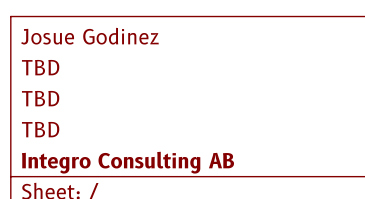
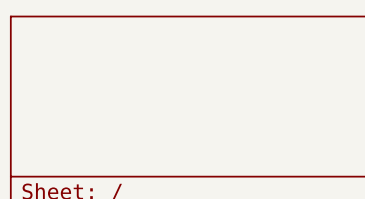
title block: Josue Godinez (89, 36) -> none
title block: TBD (40, 67) -> none
title block: TBD (40, 98) -> none
title block: TBD (40, 129) -> none
title block: Integro Consulting AB (127, 162) -> none

